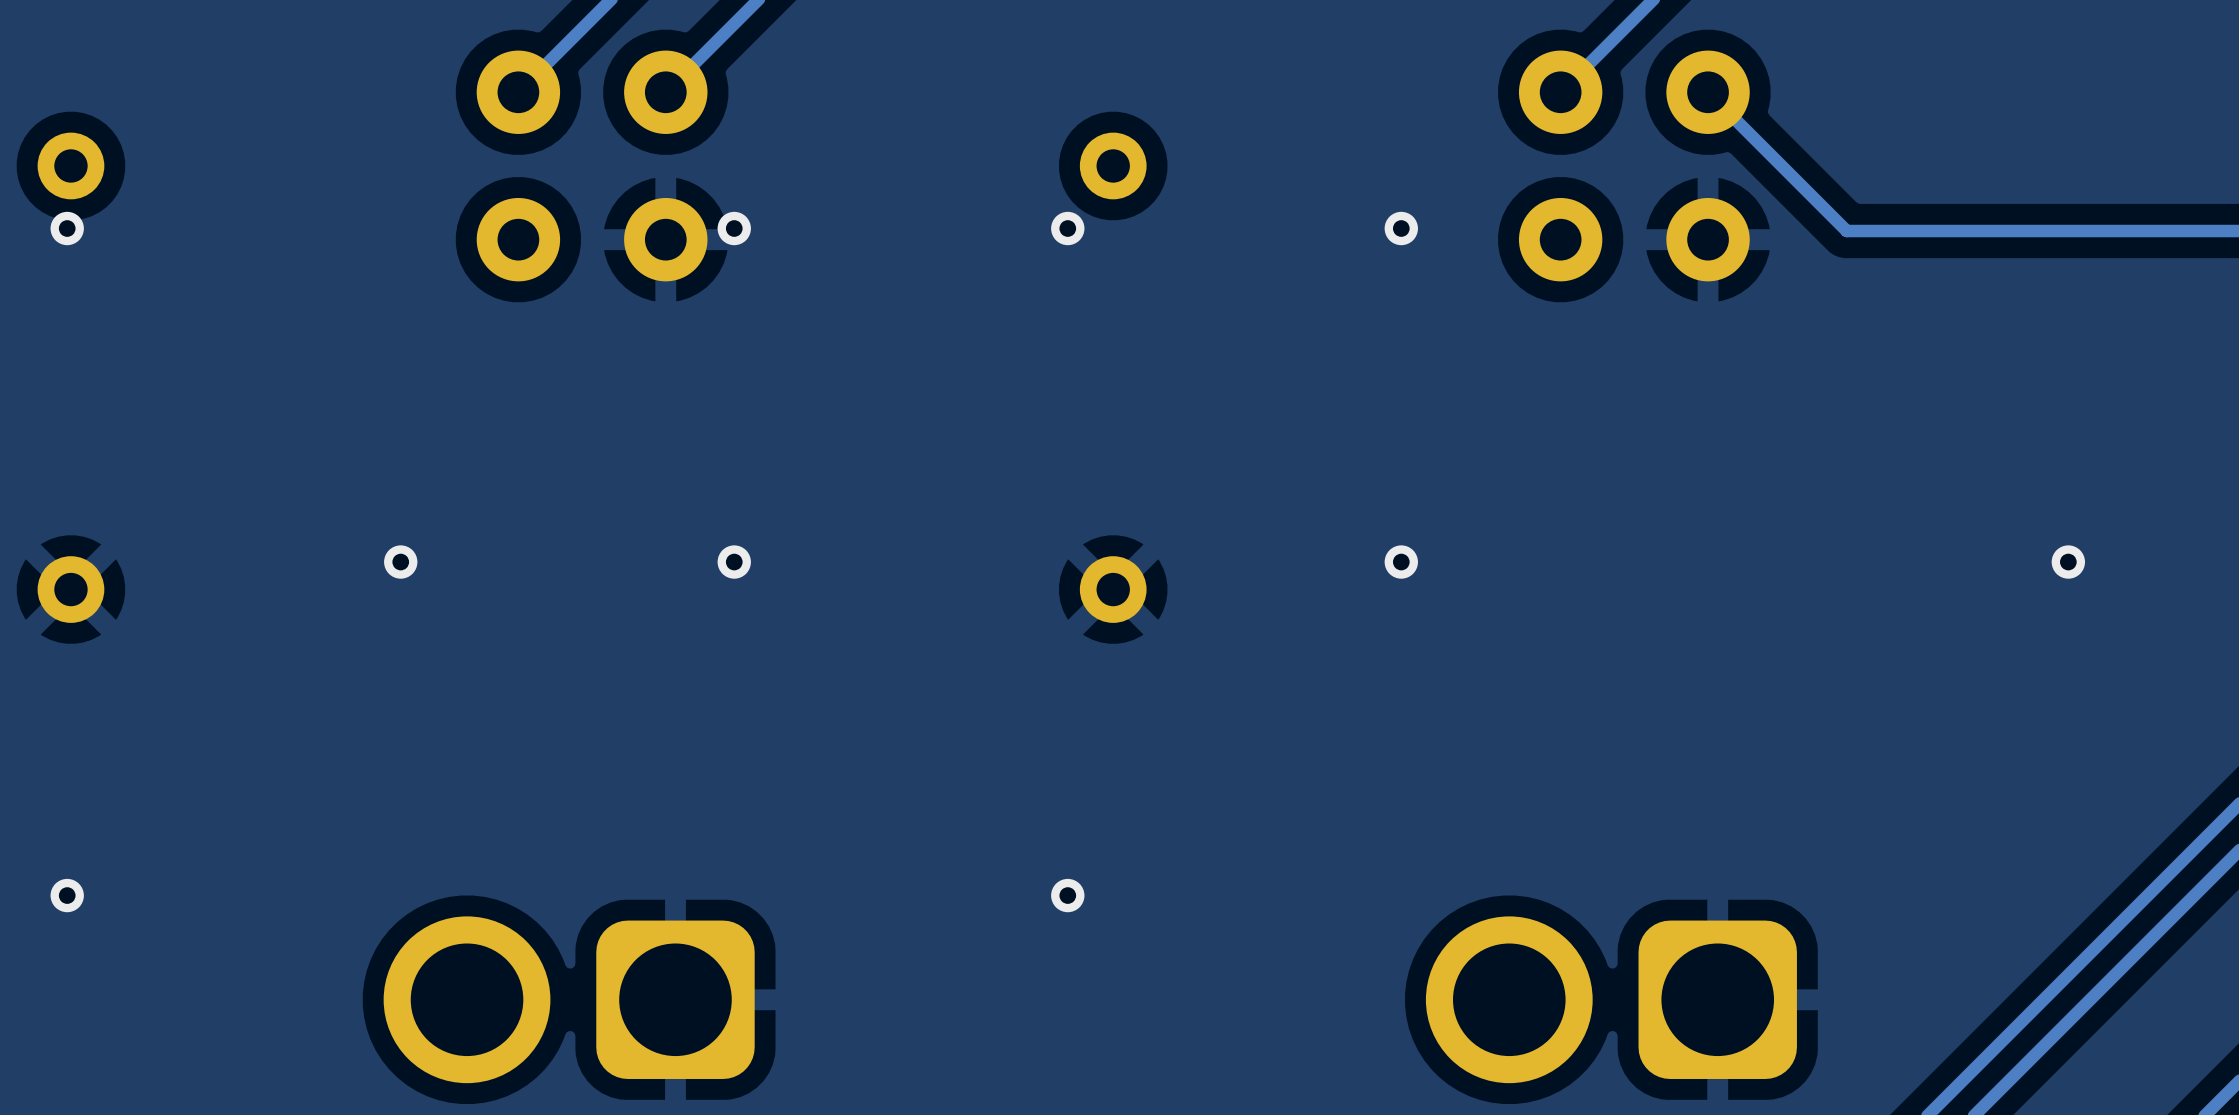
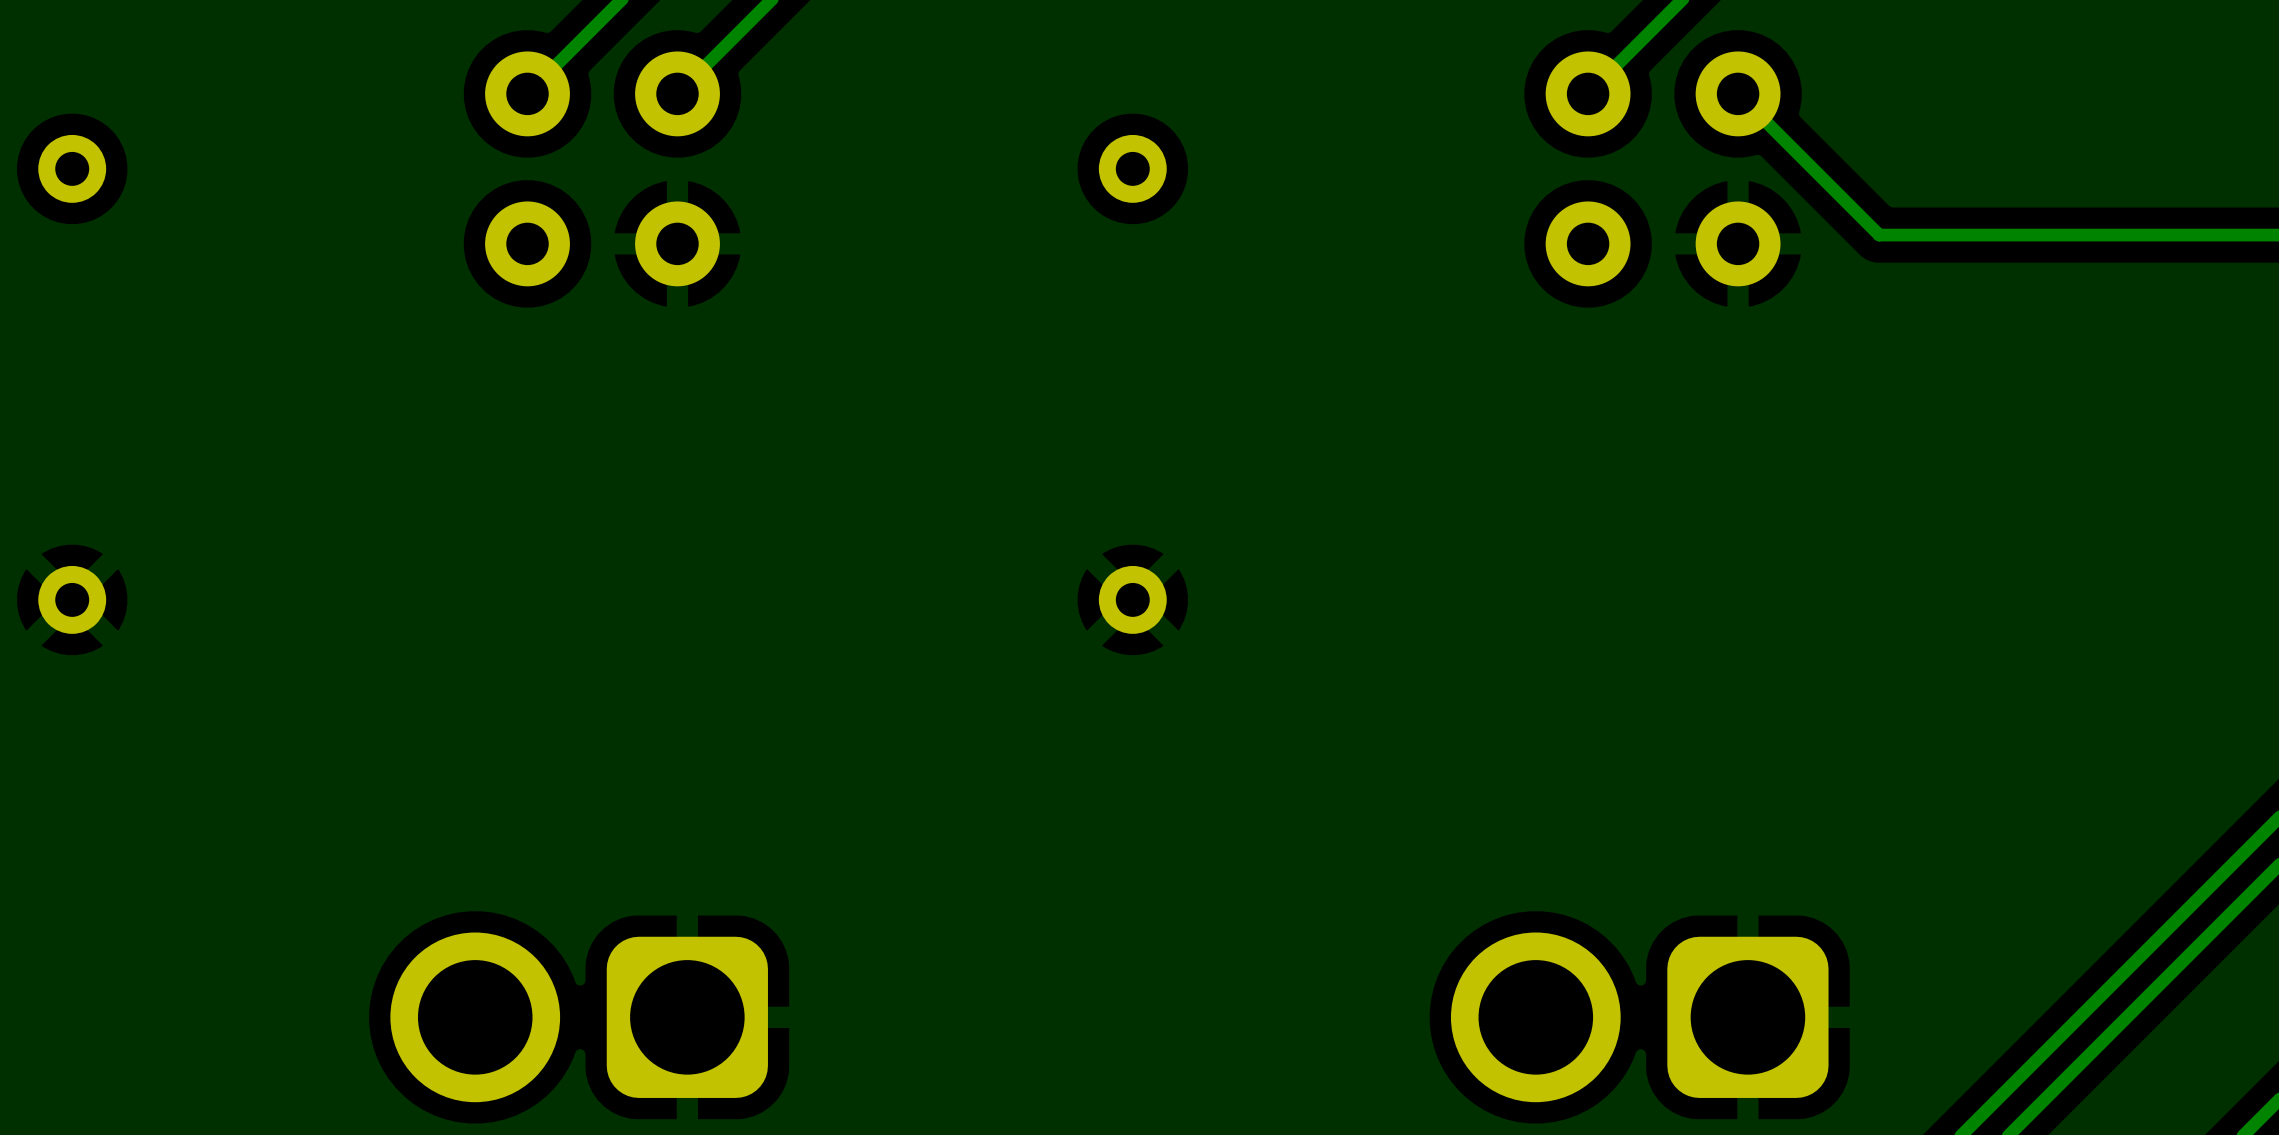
via: (67, 228) -> none
via: (734, 228) -> none
via: (1067, 228) -> none
via: (1401, 228) -> none
via: (400, 562) -> none
via: (734, 562) -> none
via: (1401, 562) -> none
via: (2068, 562) -> none
via: (67, 895) -> none
via: (1067, 895) -> none

